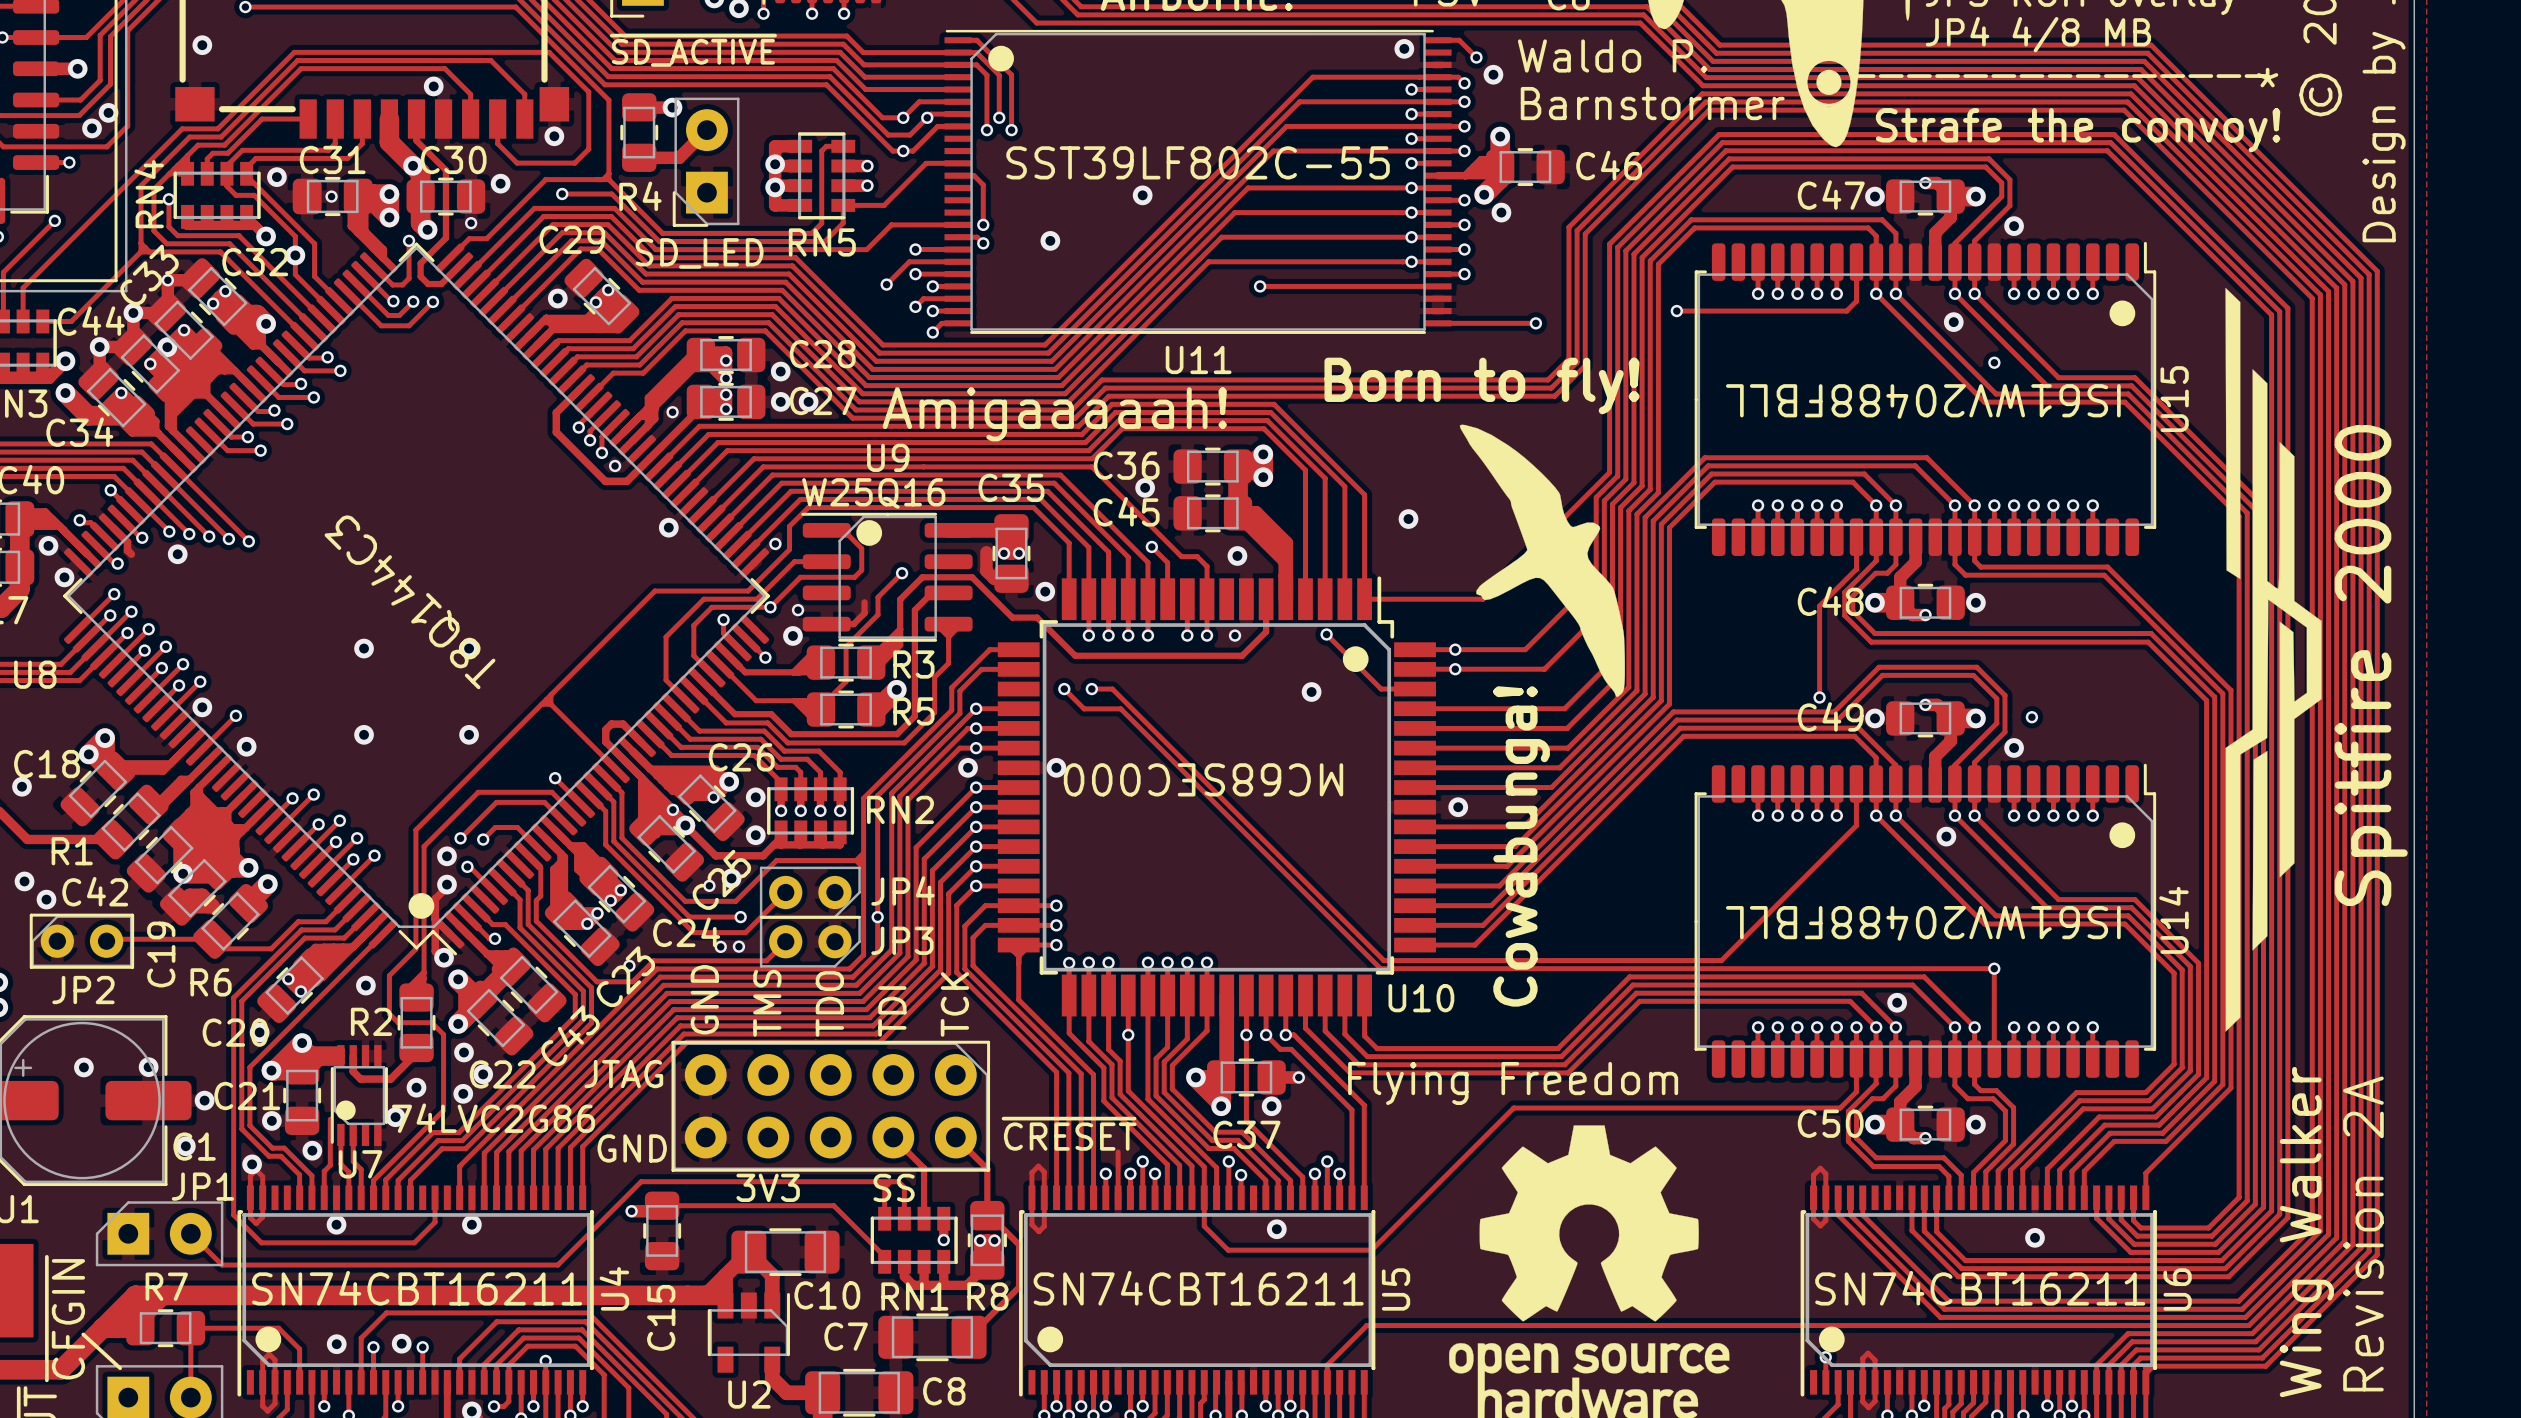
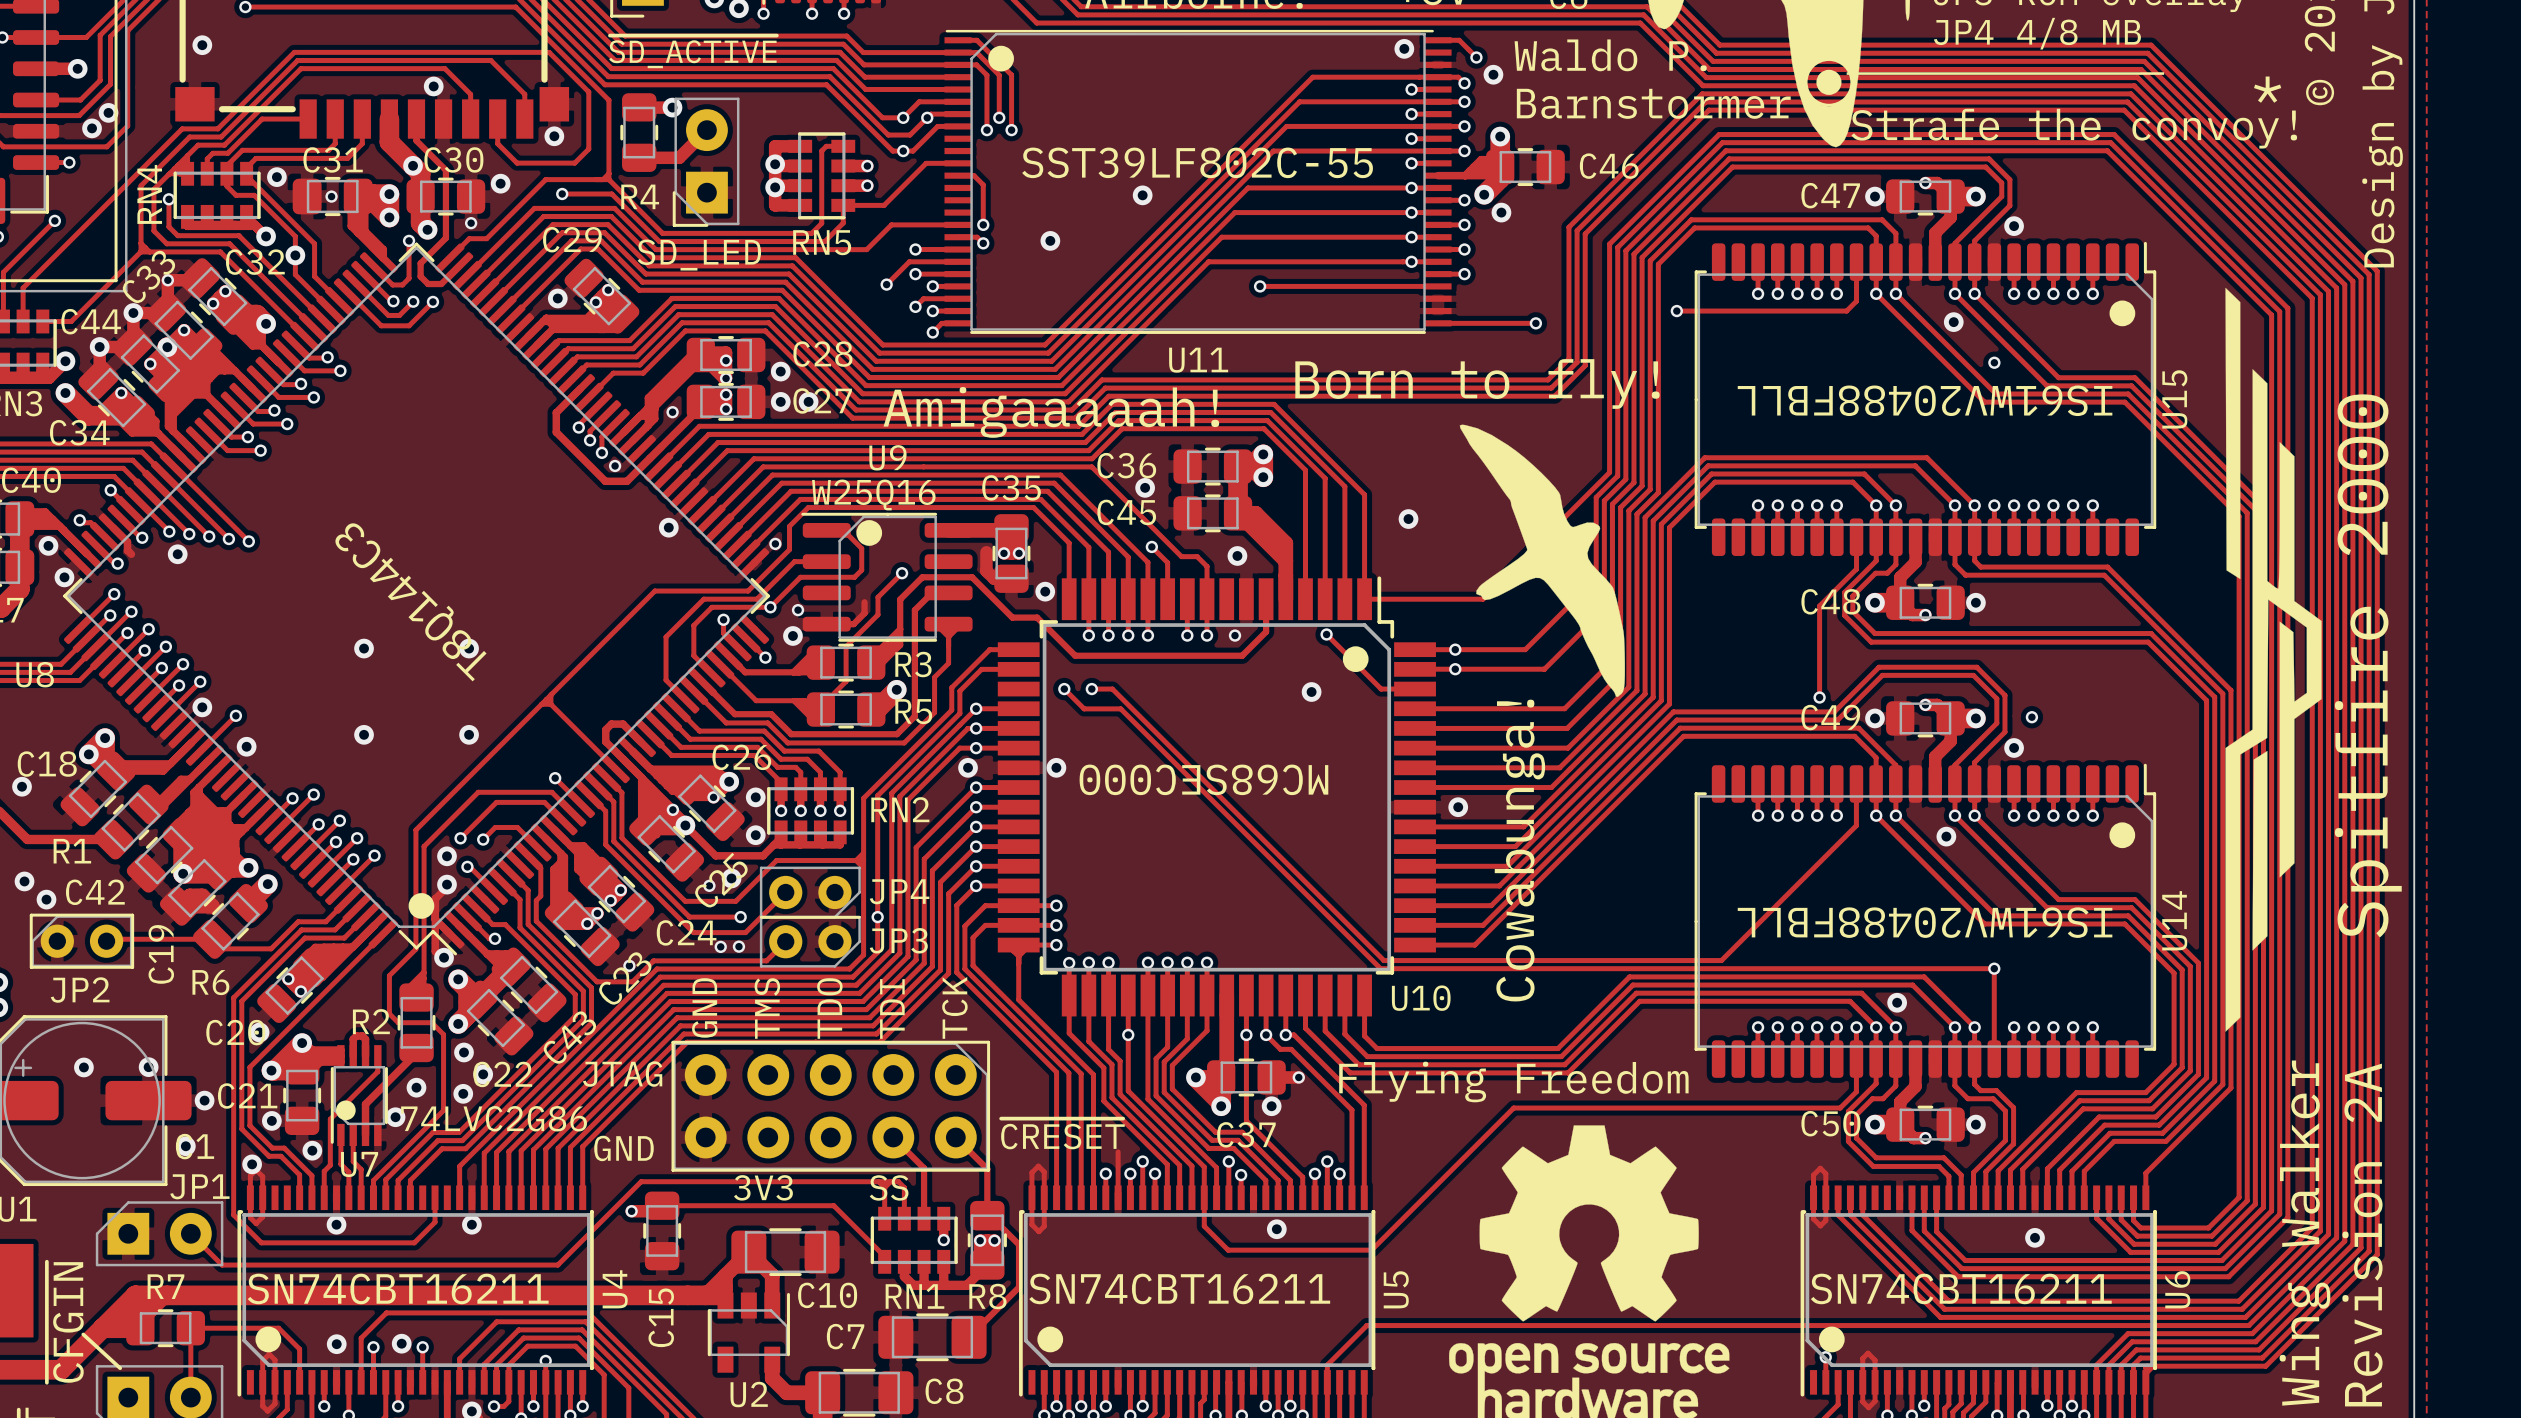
via: (365, 985) -> none
track: (353, 1056) (353, 1071) (360, 1079) (390, 1079) -> (353, 1056) (353, 1039) (356, 1035) (362, 1035) (365, 1039) (365, 1056)
track: none -> (377, 1056) (377, 1071) (330, 1119)
track: none -> (390, 1079) (365, 1104) (365, 1134)

